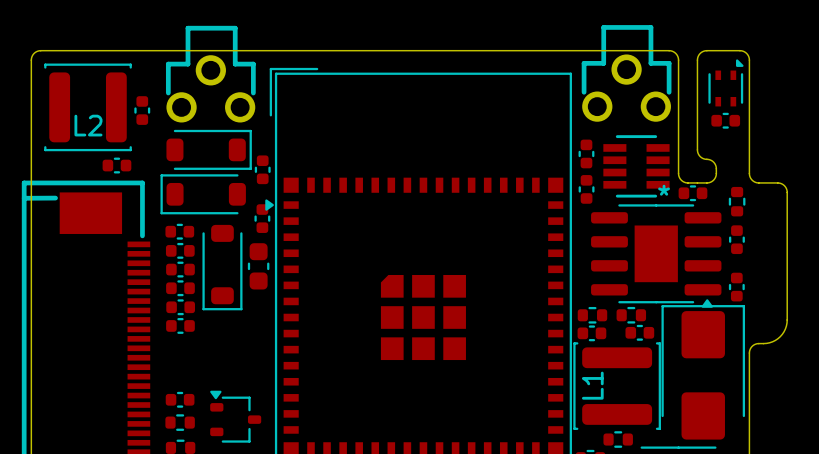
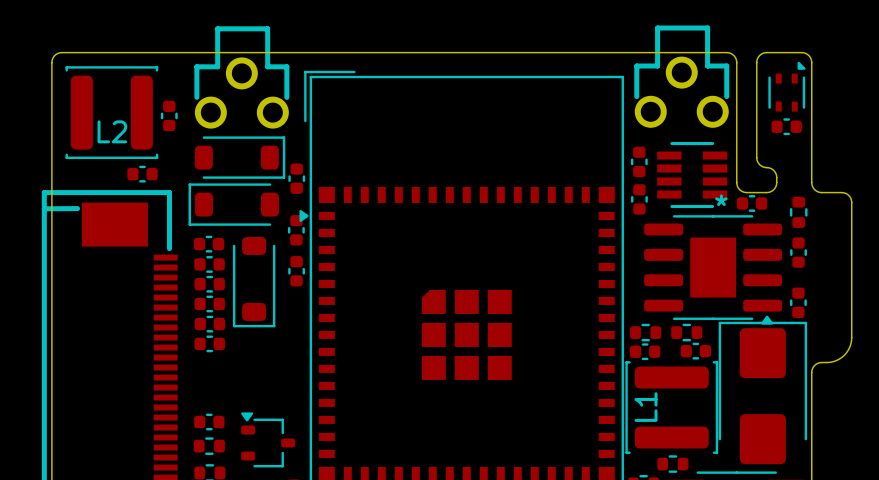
part footprint: [247, 243, 270, 290] -> [288, 256, 305, 287]

